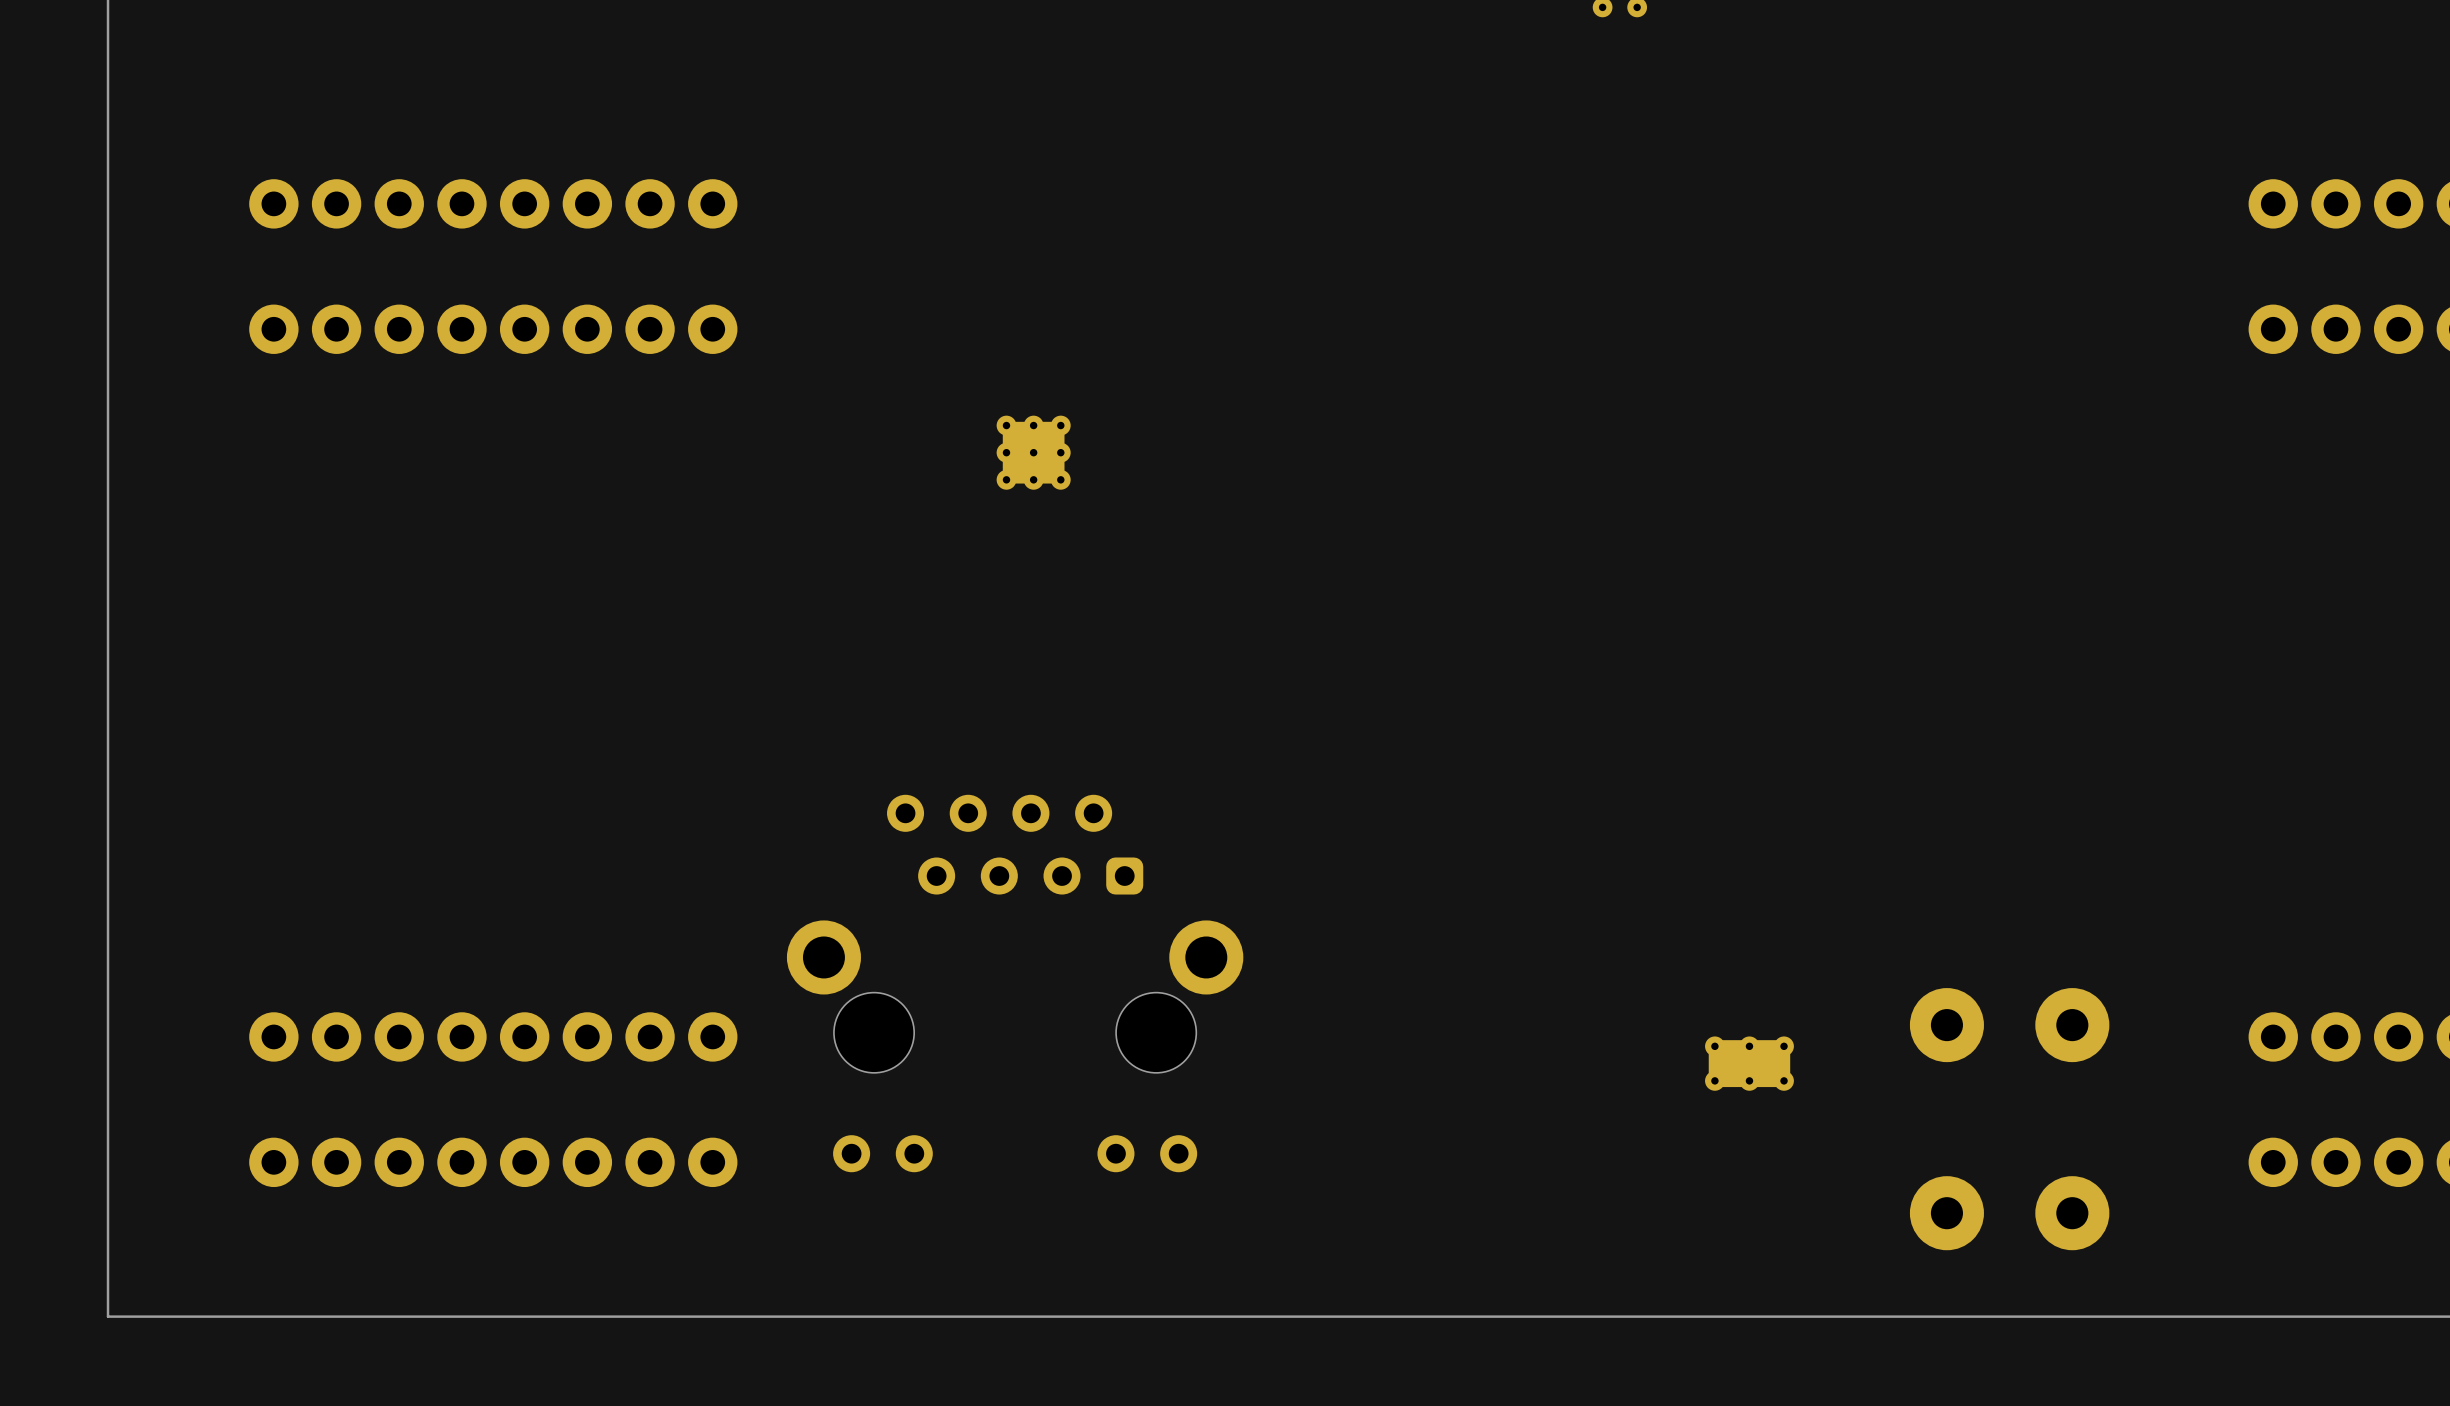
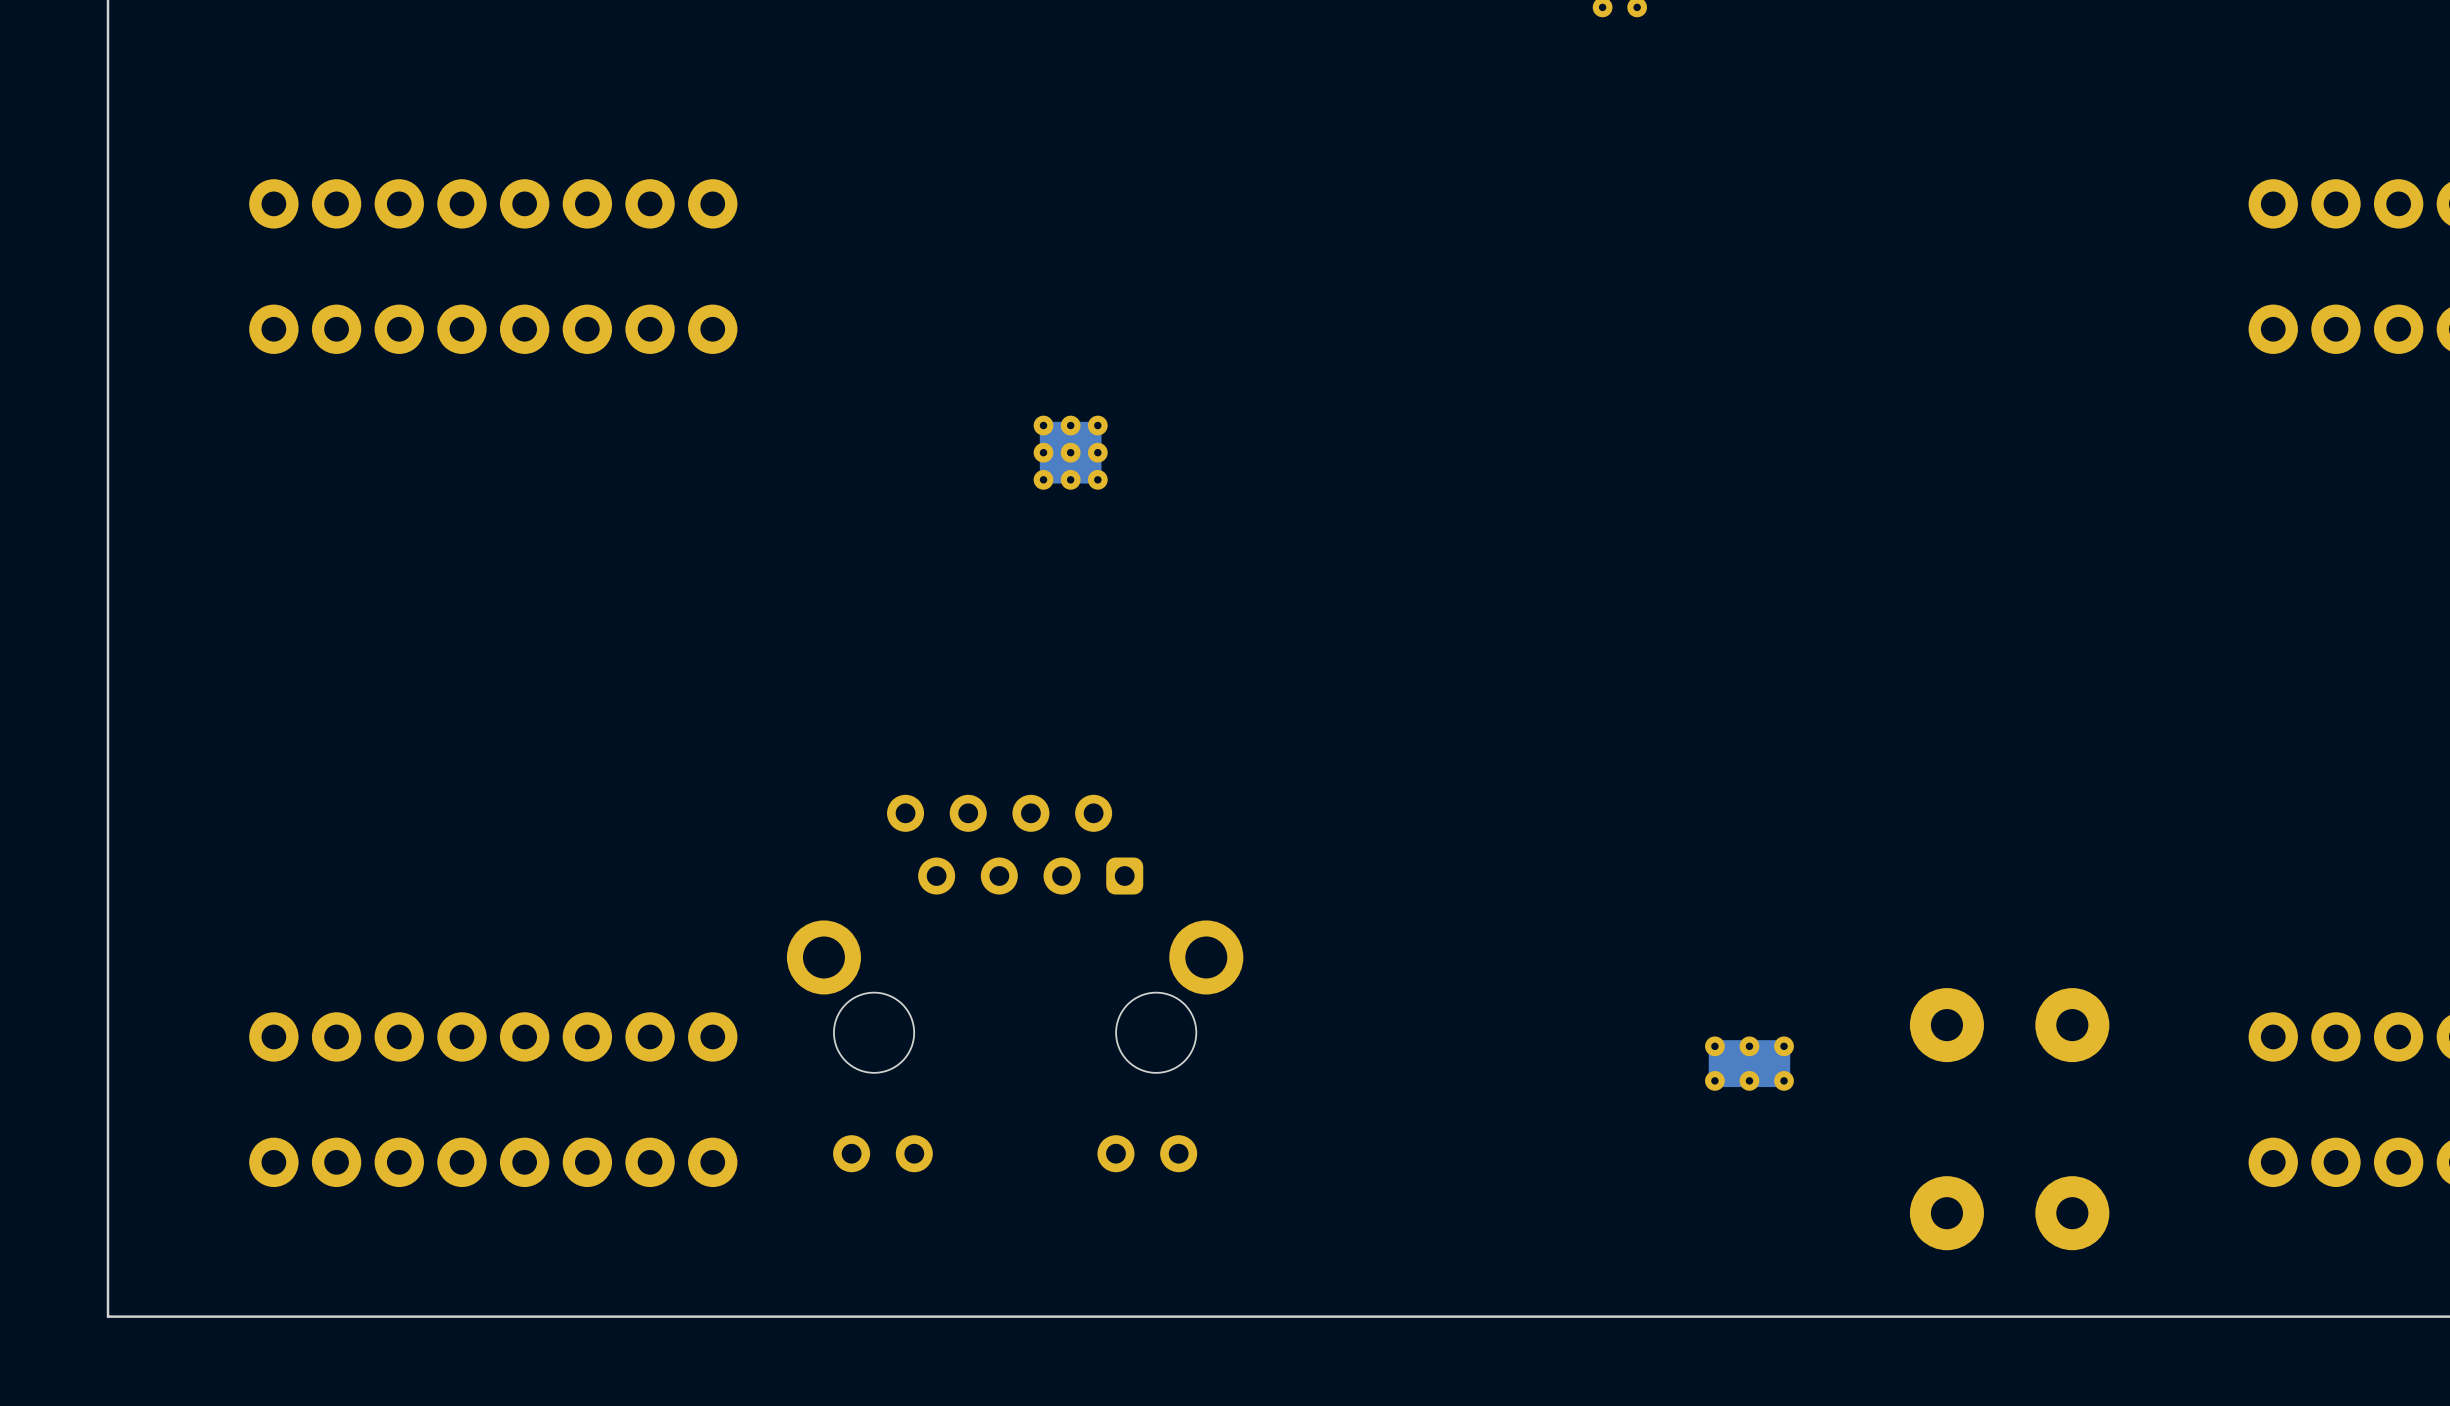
part position: (1033, 452) -> (1070, 452)

